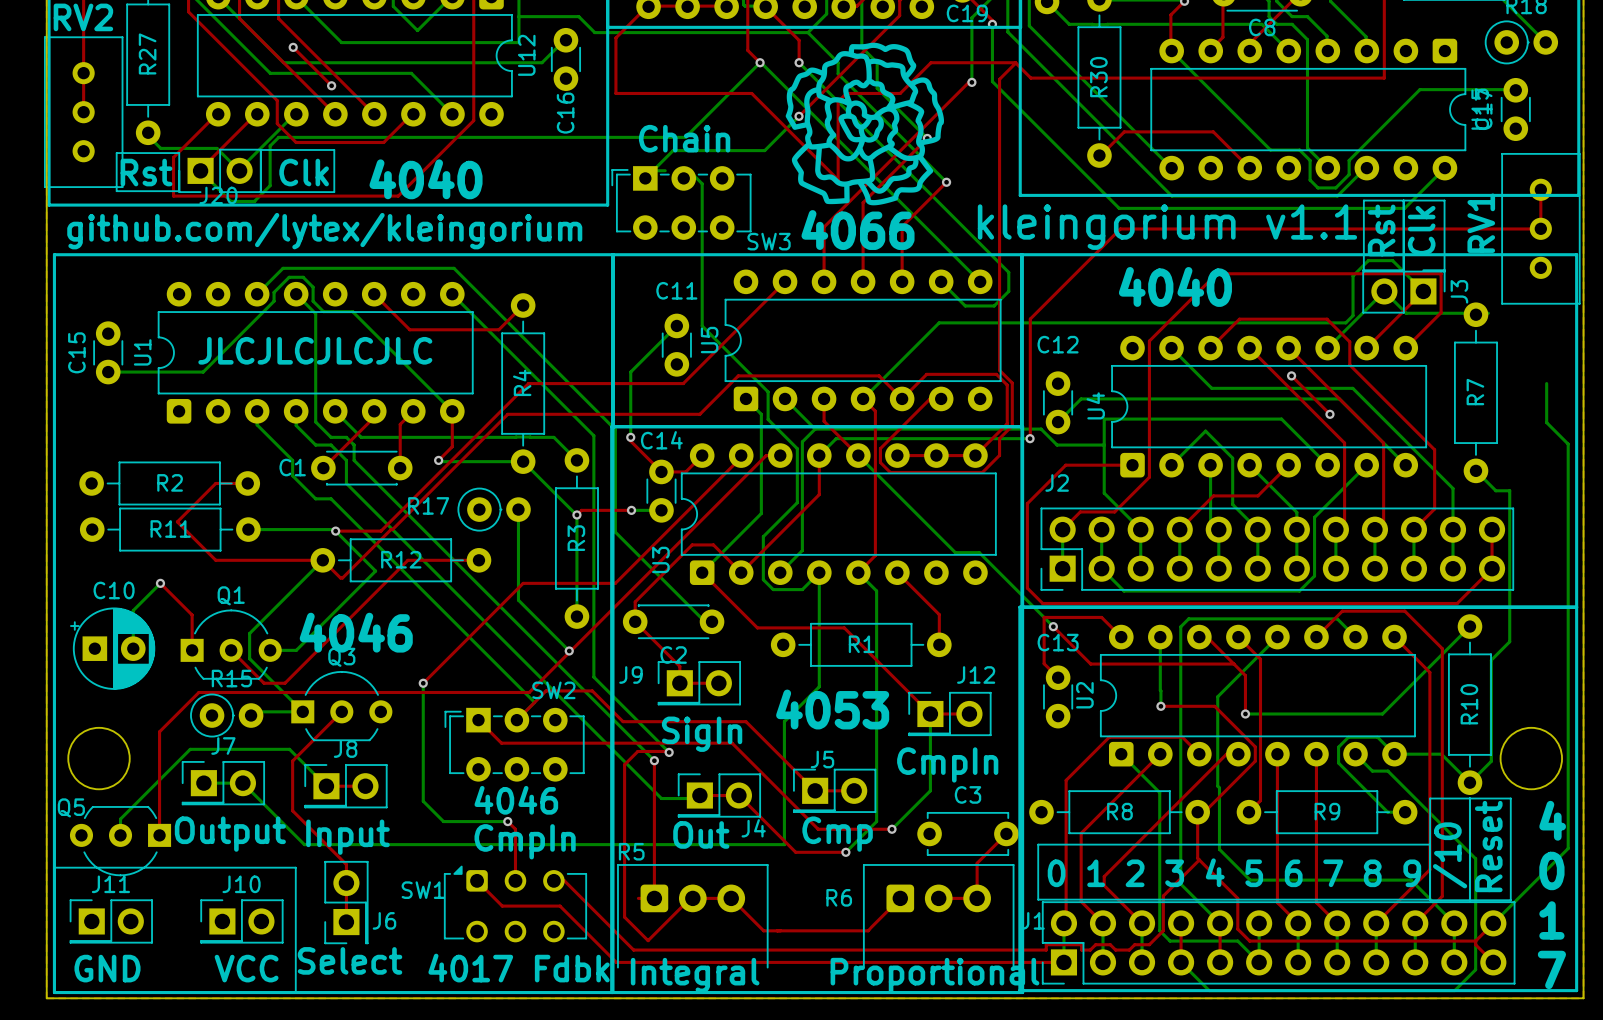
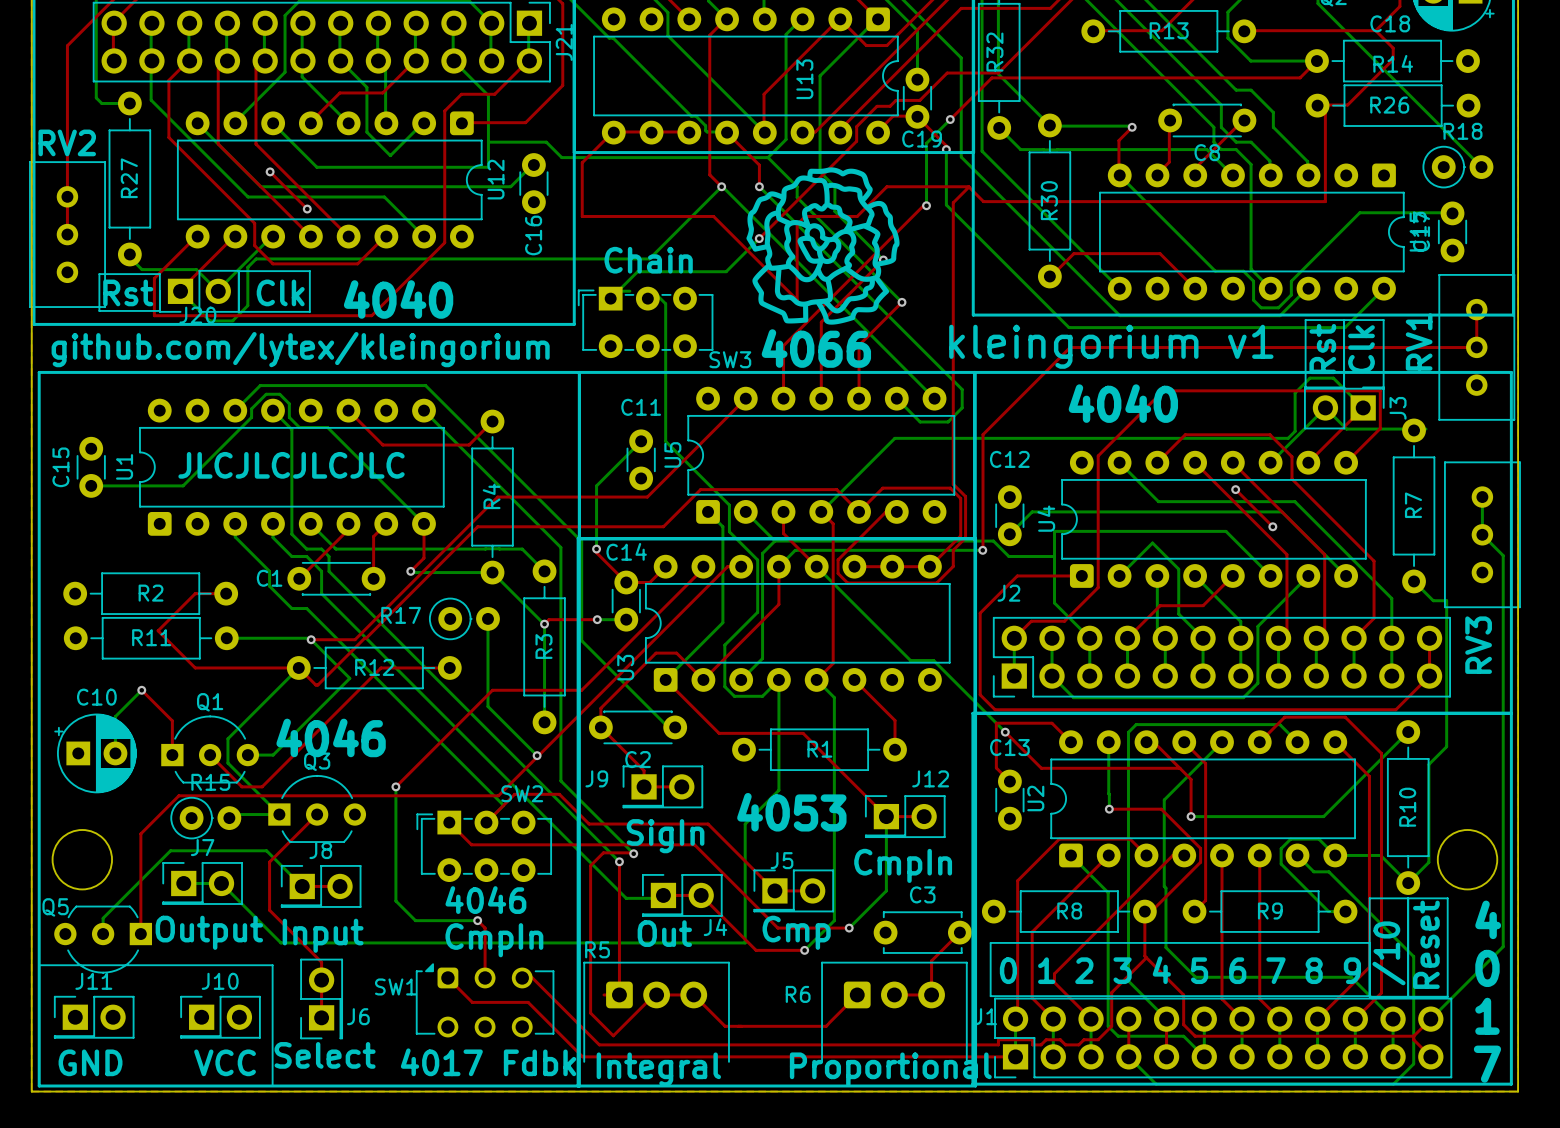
text: kleingorium v1.1 (1167, 227) -> kleingorium v1 (1111, 346)
RV3: none -> (1482, 534)

